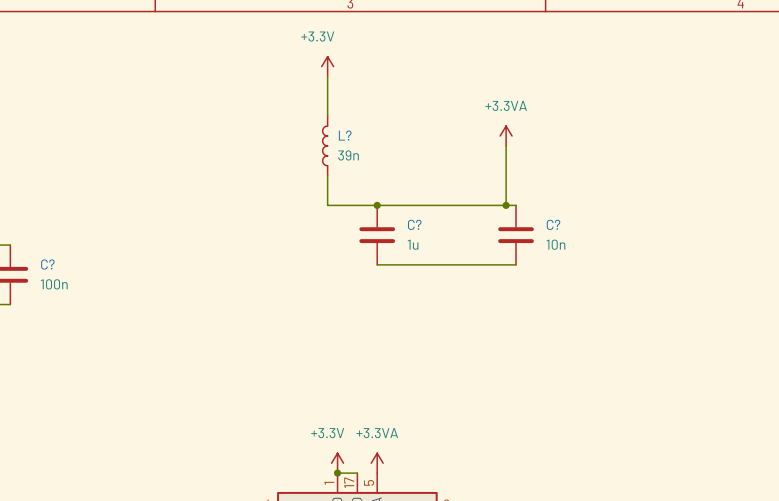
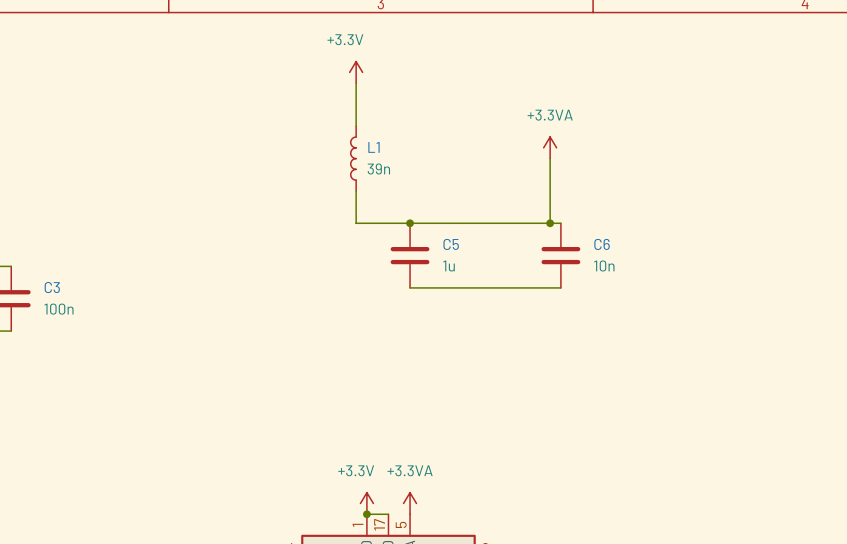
L? name: L? (345, 135) -> L1 (373, 147)
C? name: C? (414, 224) -> C5 (451, 244)
C? name: C? (553, 224) -> C6 (602, 244)
C? name: C? (47, 264) -> C3 (52, 287)

